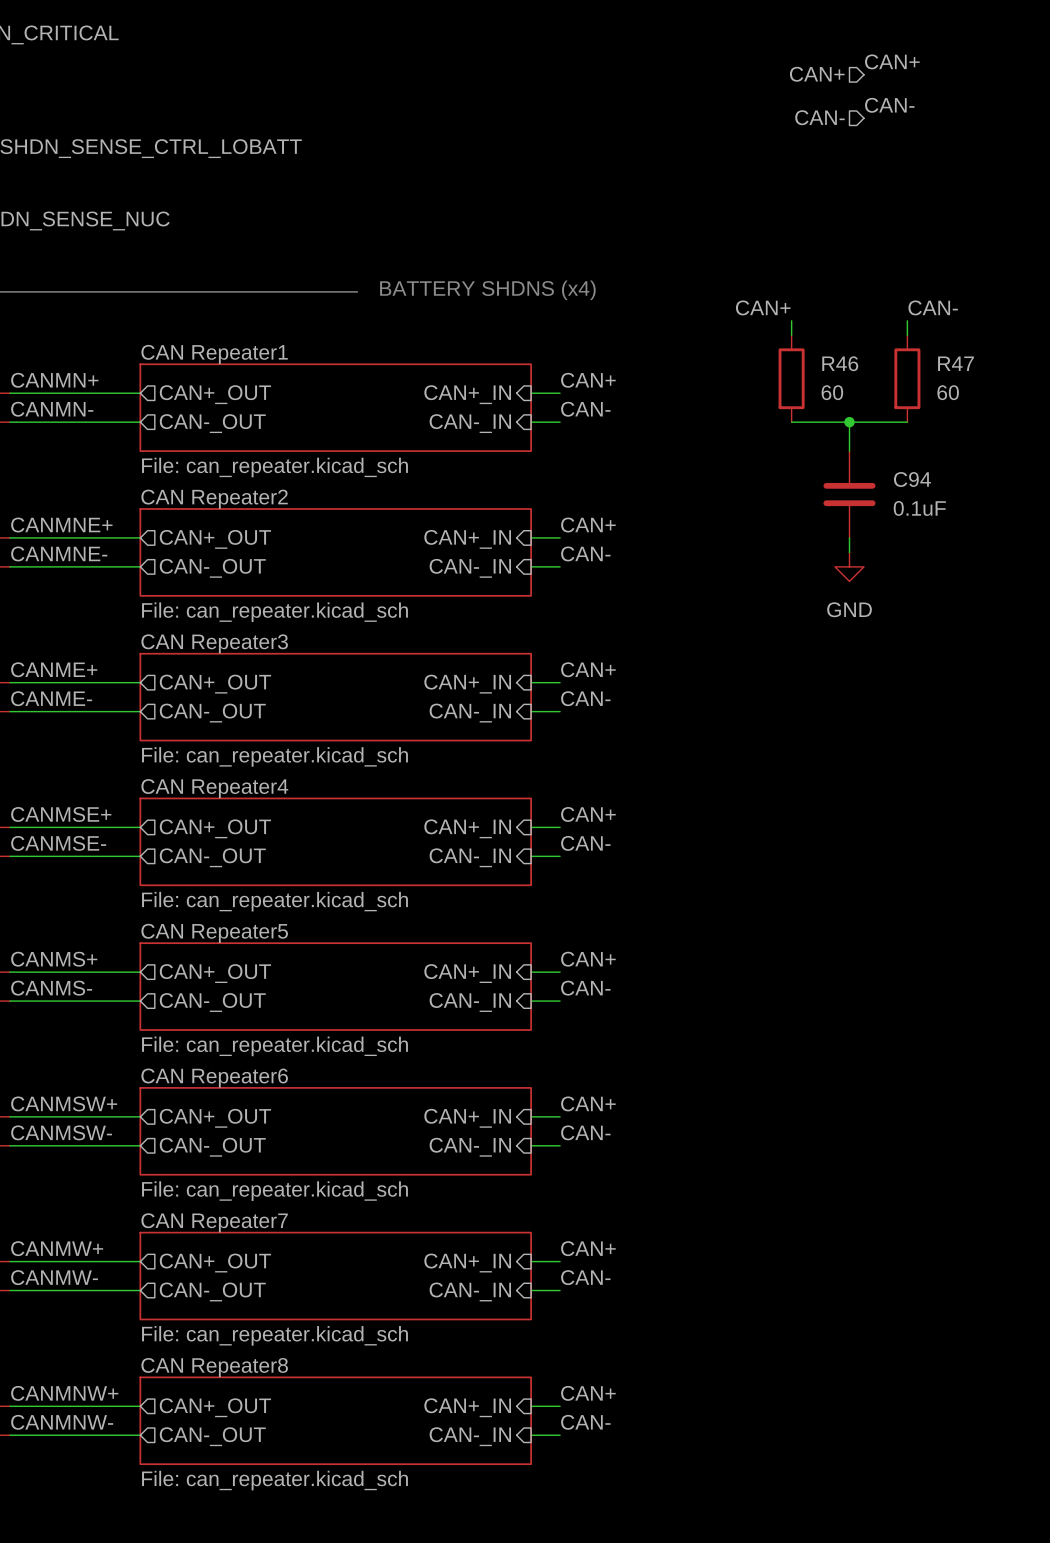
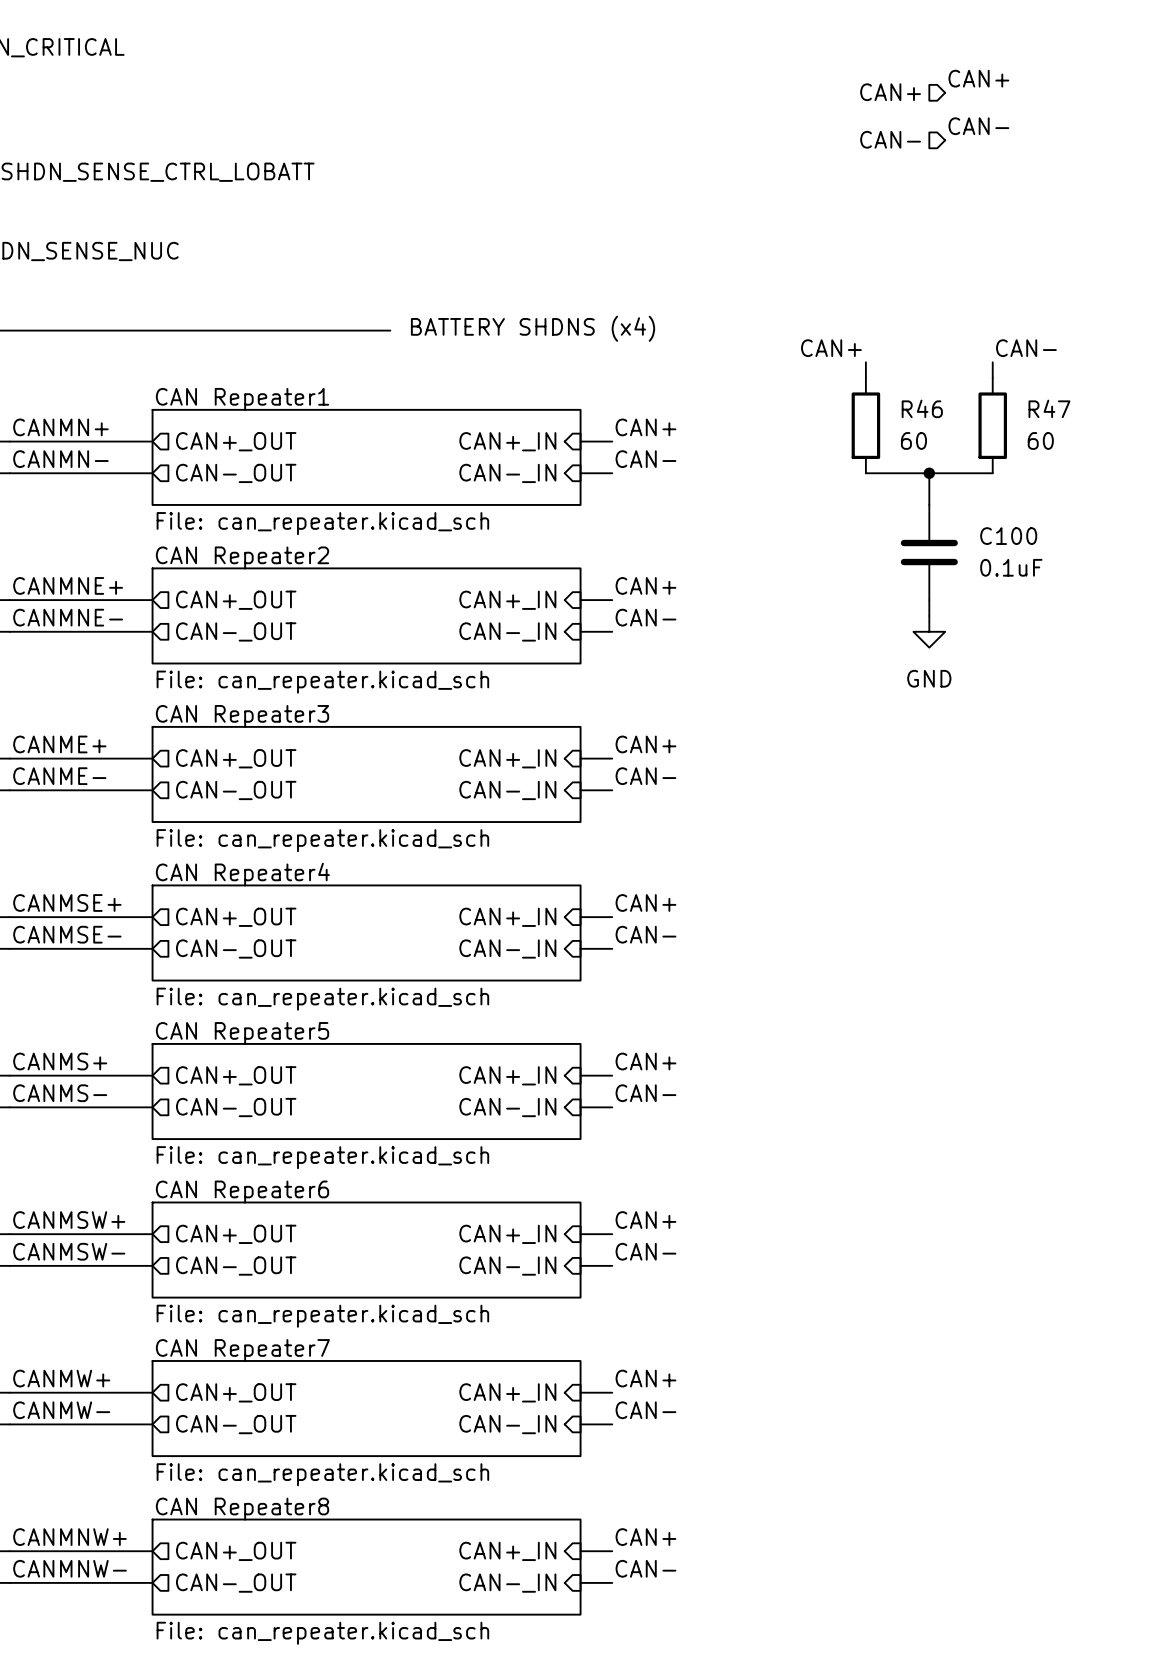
C94 name: C94 (912, 479) -> C100 (1008, 536)

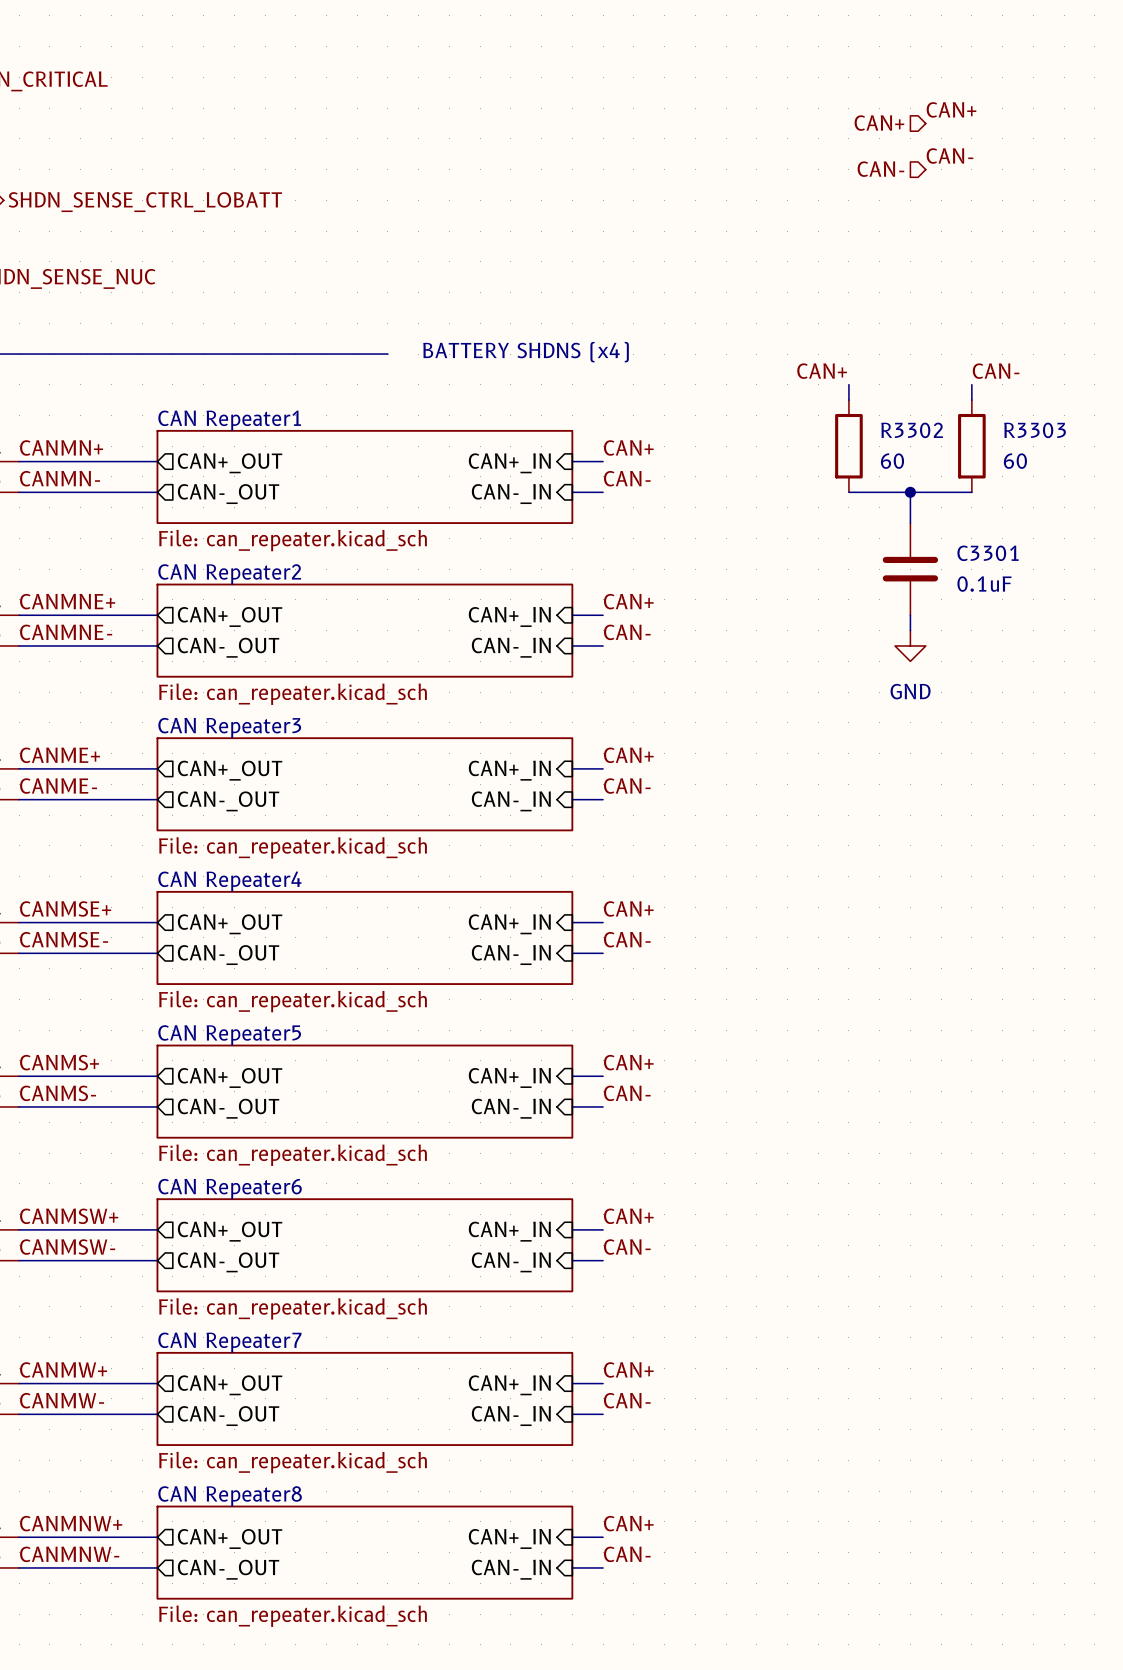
R46 name: R46 (922, 408) -> R3302 (912, 430)
R47 name: R47 (1049, 408) -> R3303 (1035, 430)
C100 name: C100 (1008, 536) -> C3301 (988, 553)

